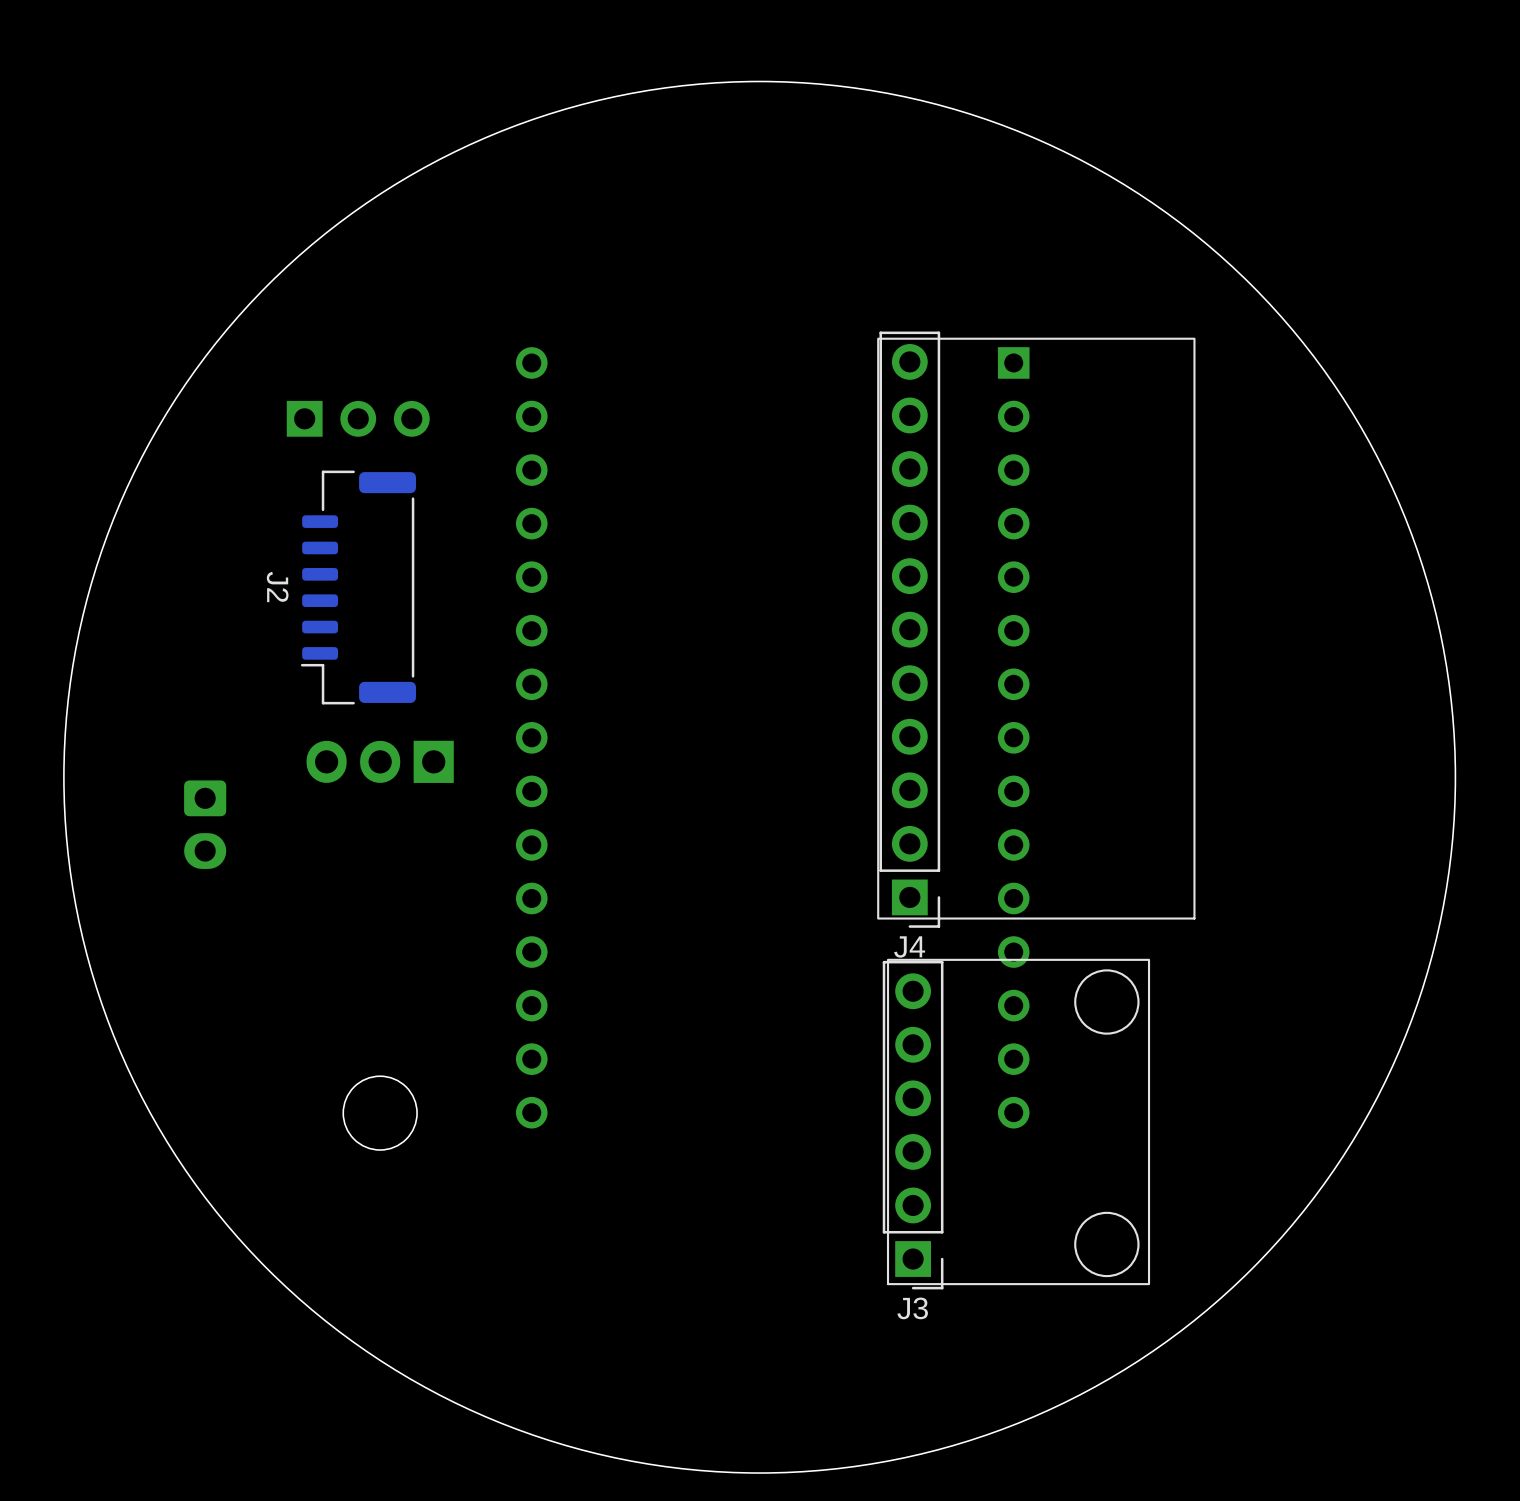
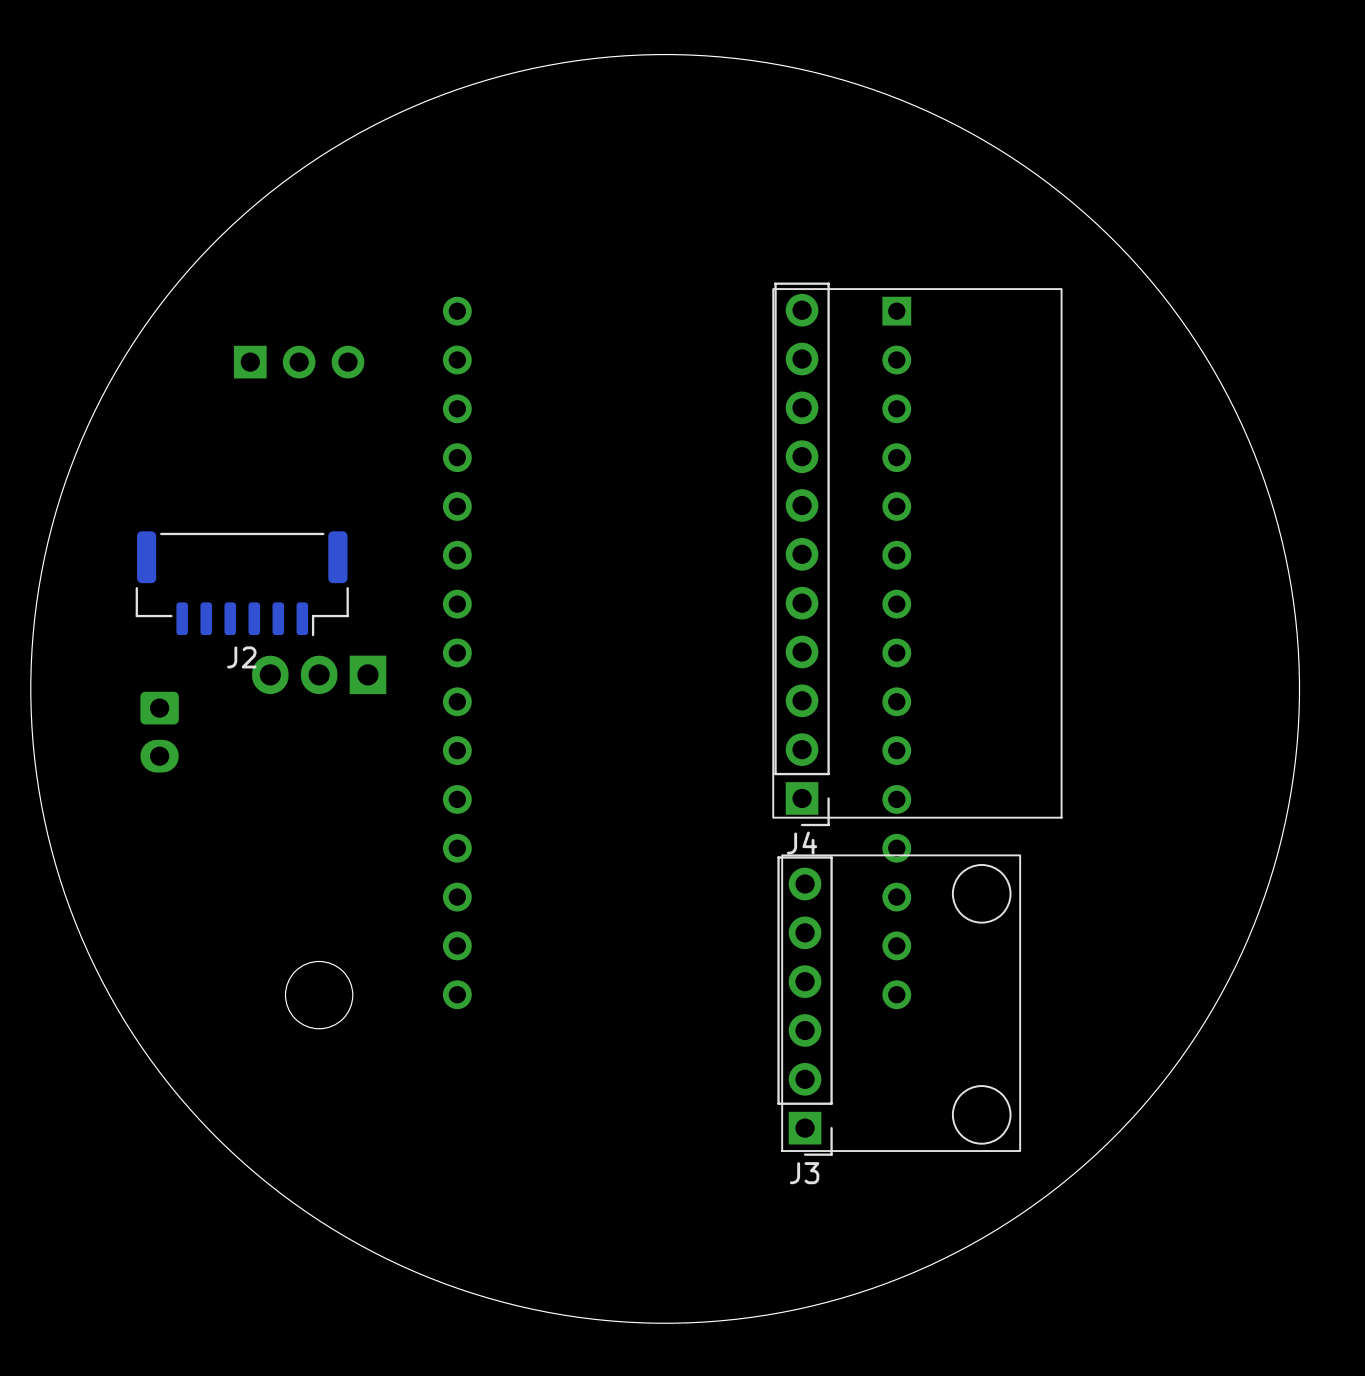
J2 rotation: 0° (358, 587) -> 90° counterclockwise (242, 583)

